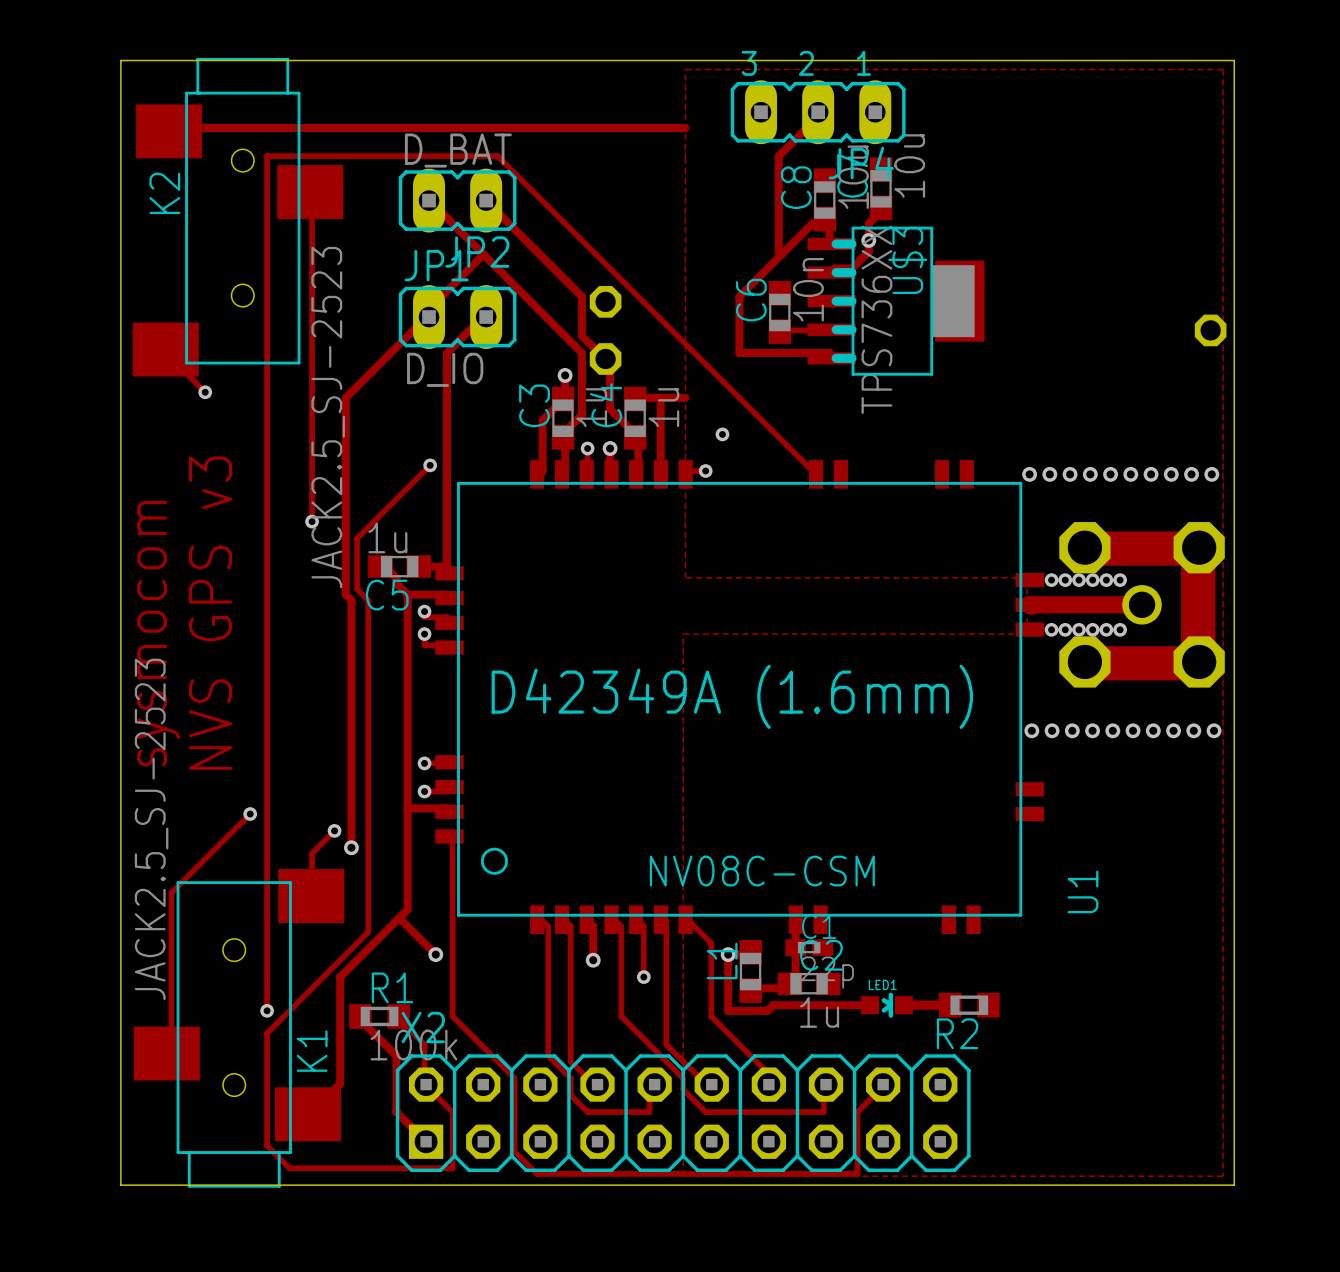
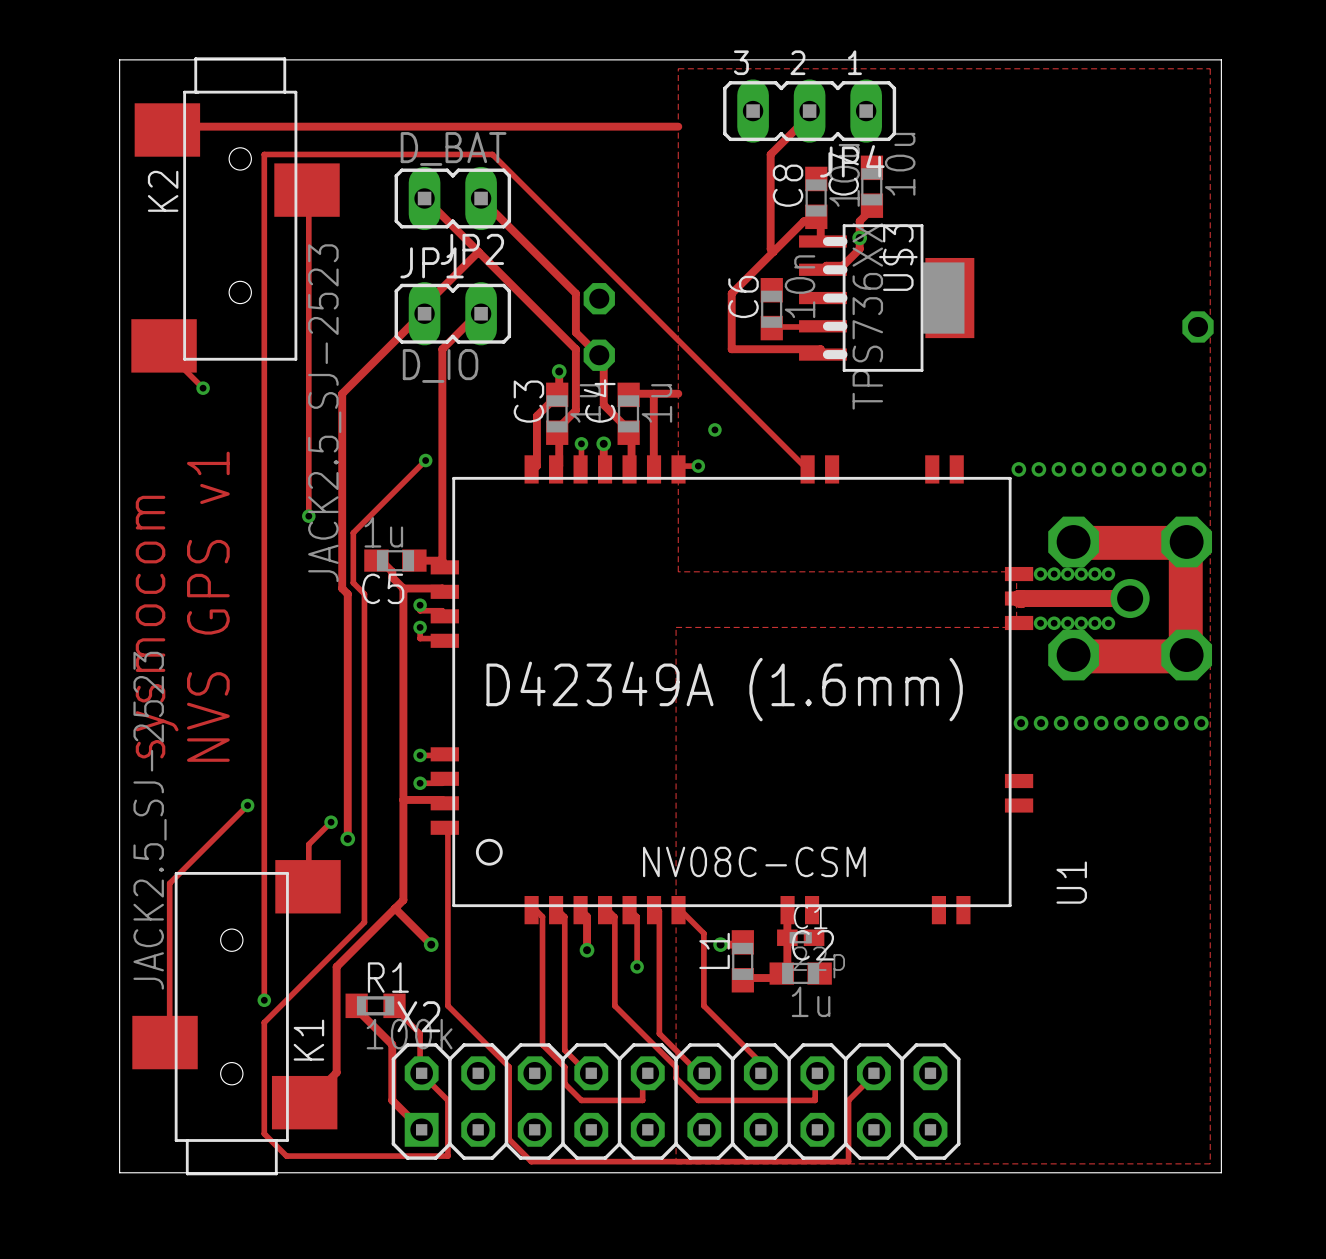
text: NVS GPS v3 (210, 613) -> NVS GPS v1 (208, 606)
track: (728, 954) (728, 1010) (767, 1010) (773, 1005) (870, 1005) -> none
LED1: (887, 1005) -> none
track: (903, 1005) (950, 1005) -> none
R2: (969, 1005) -> none

